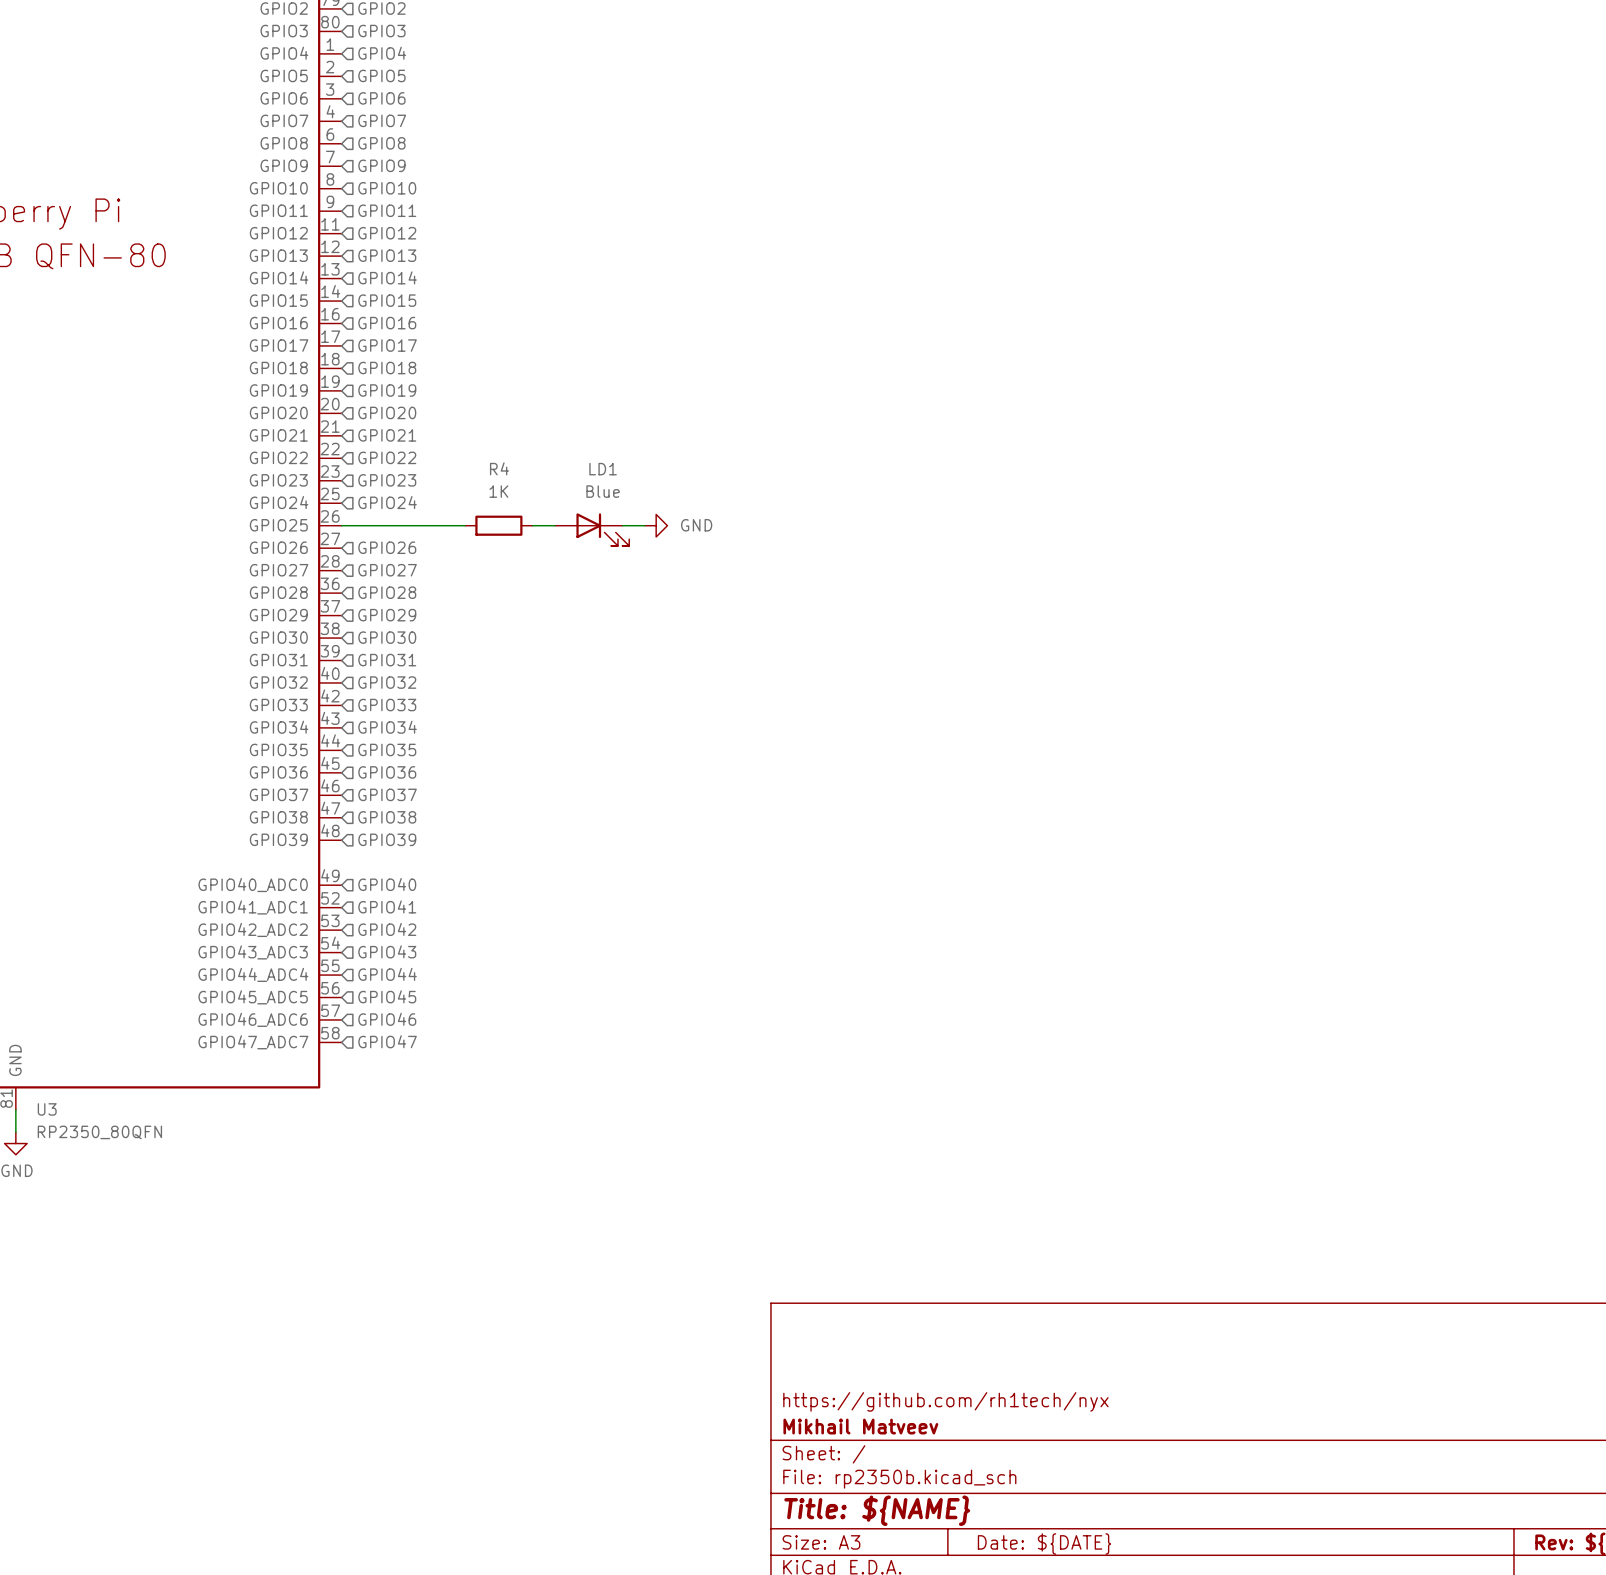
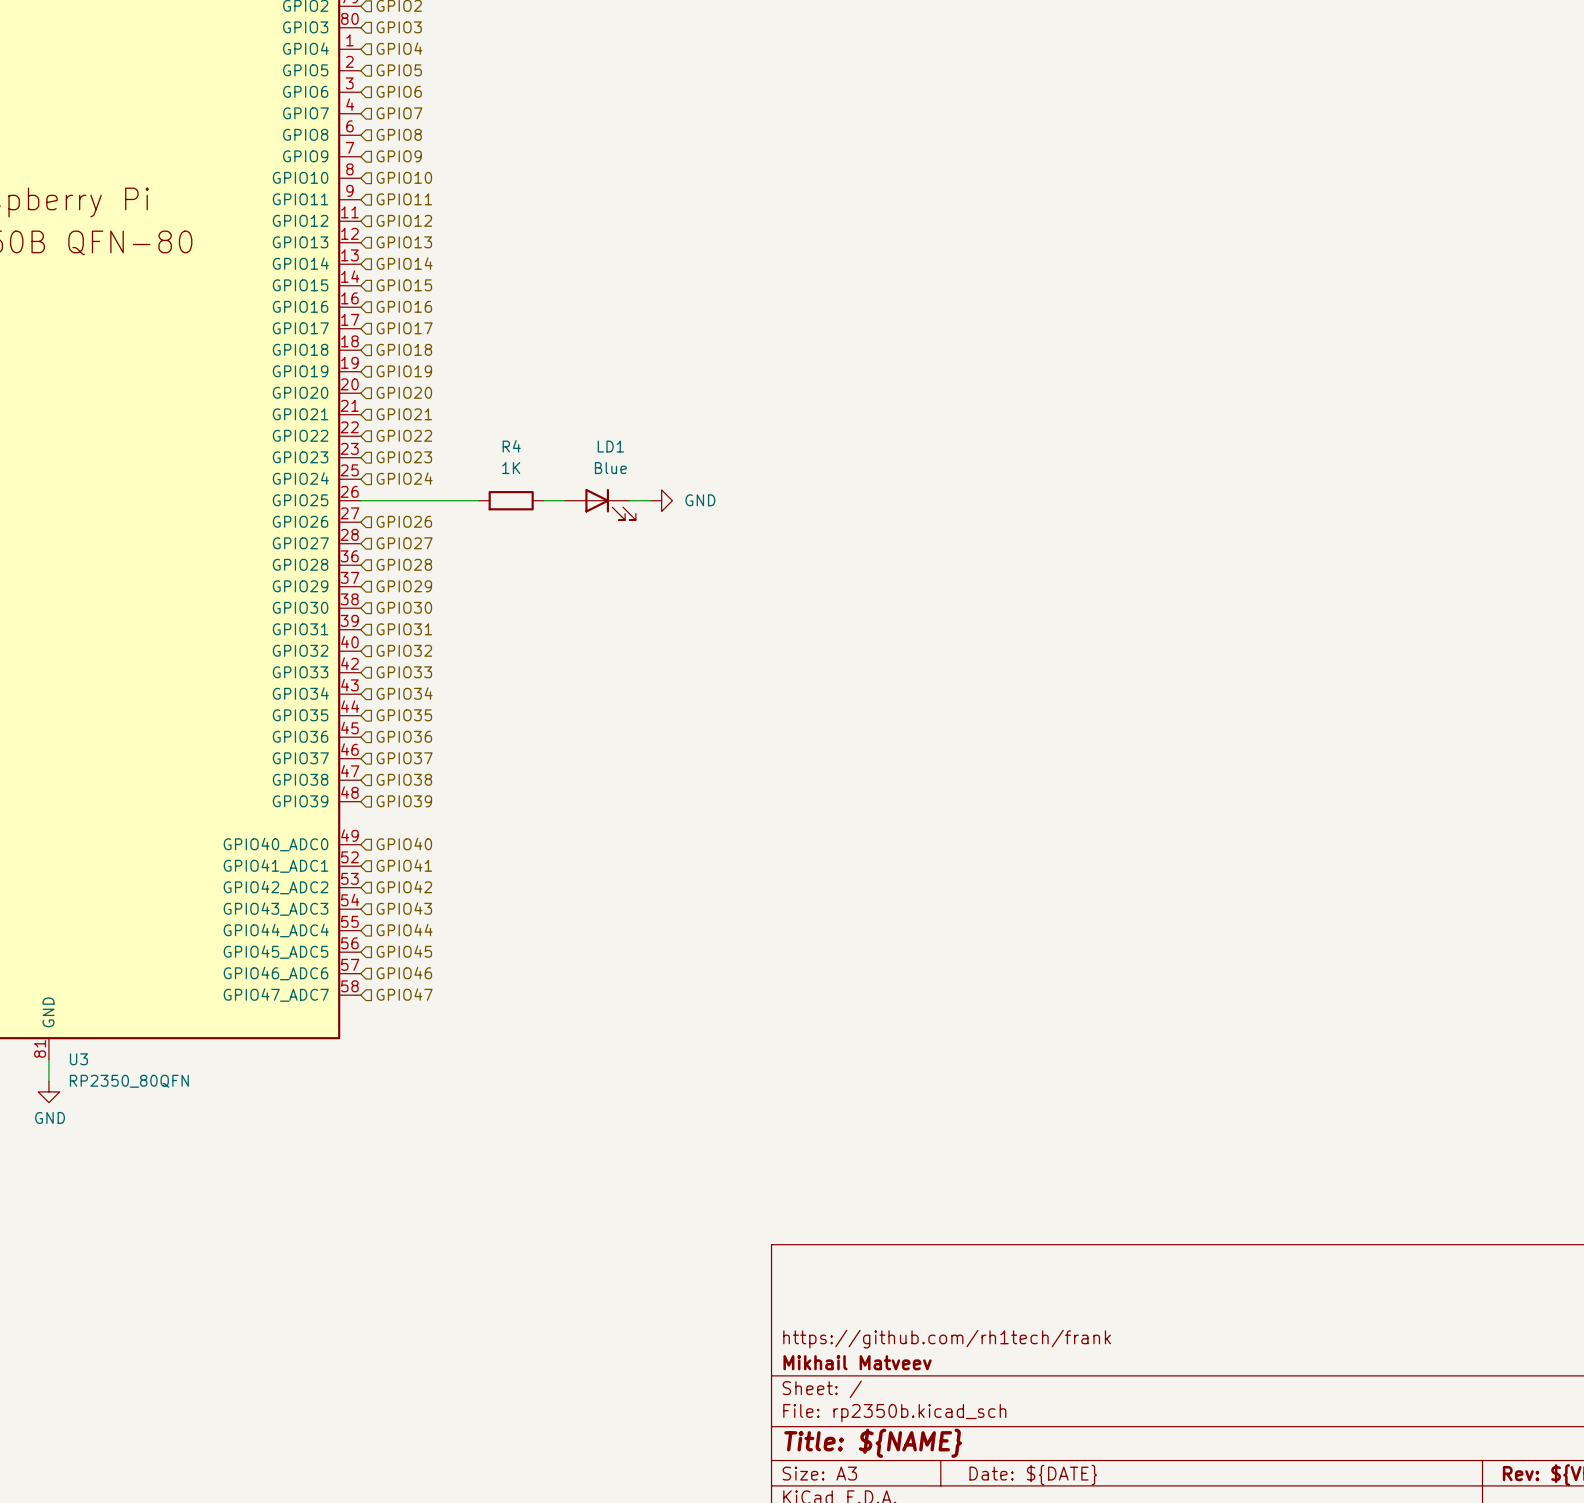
title block: https://github.com/rh1tech/nyx (945, 1401) -> https://github.com/rh1tech/frank (947, 1339)

